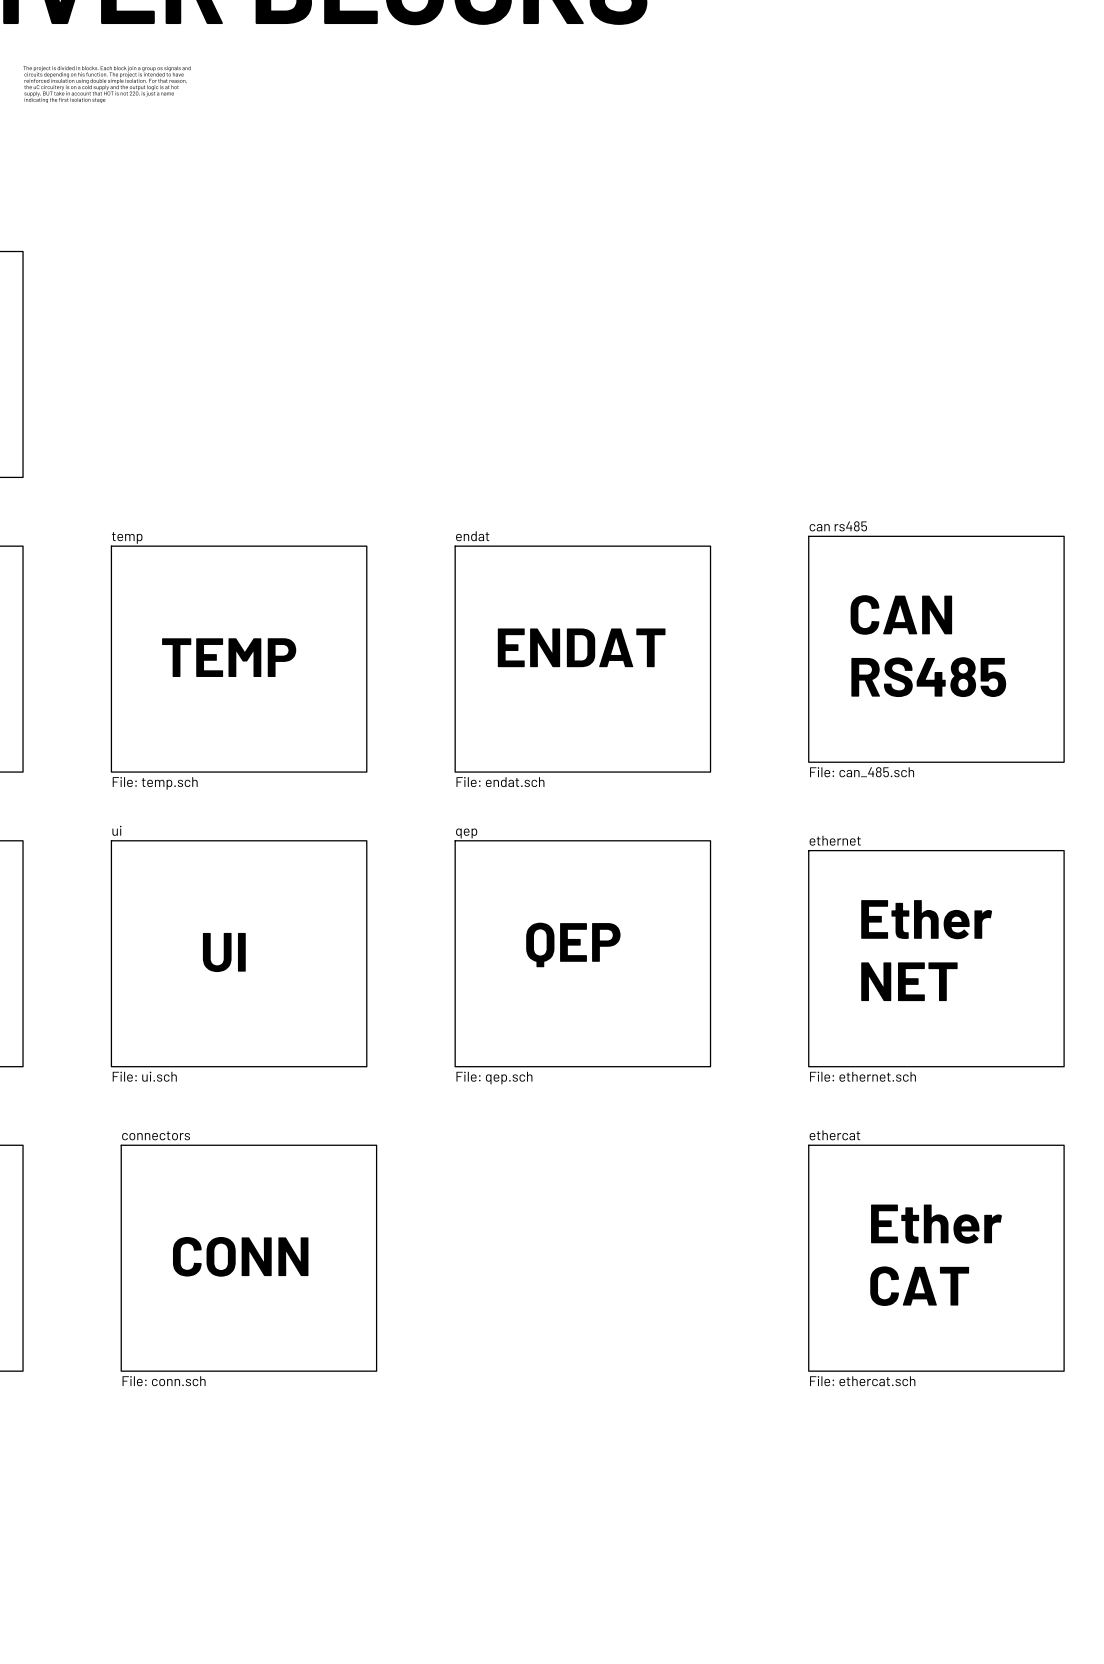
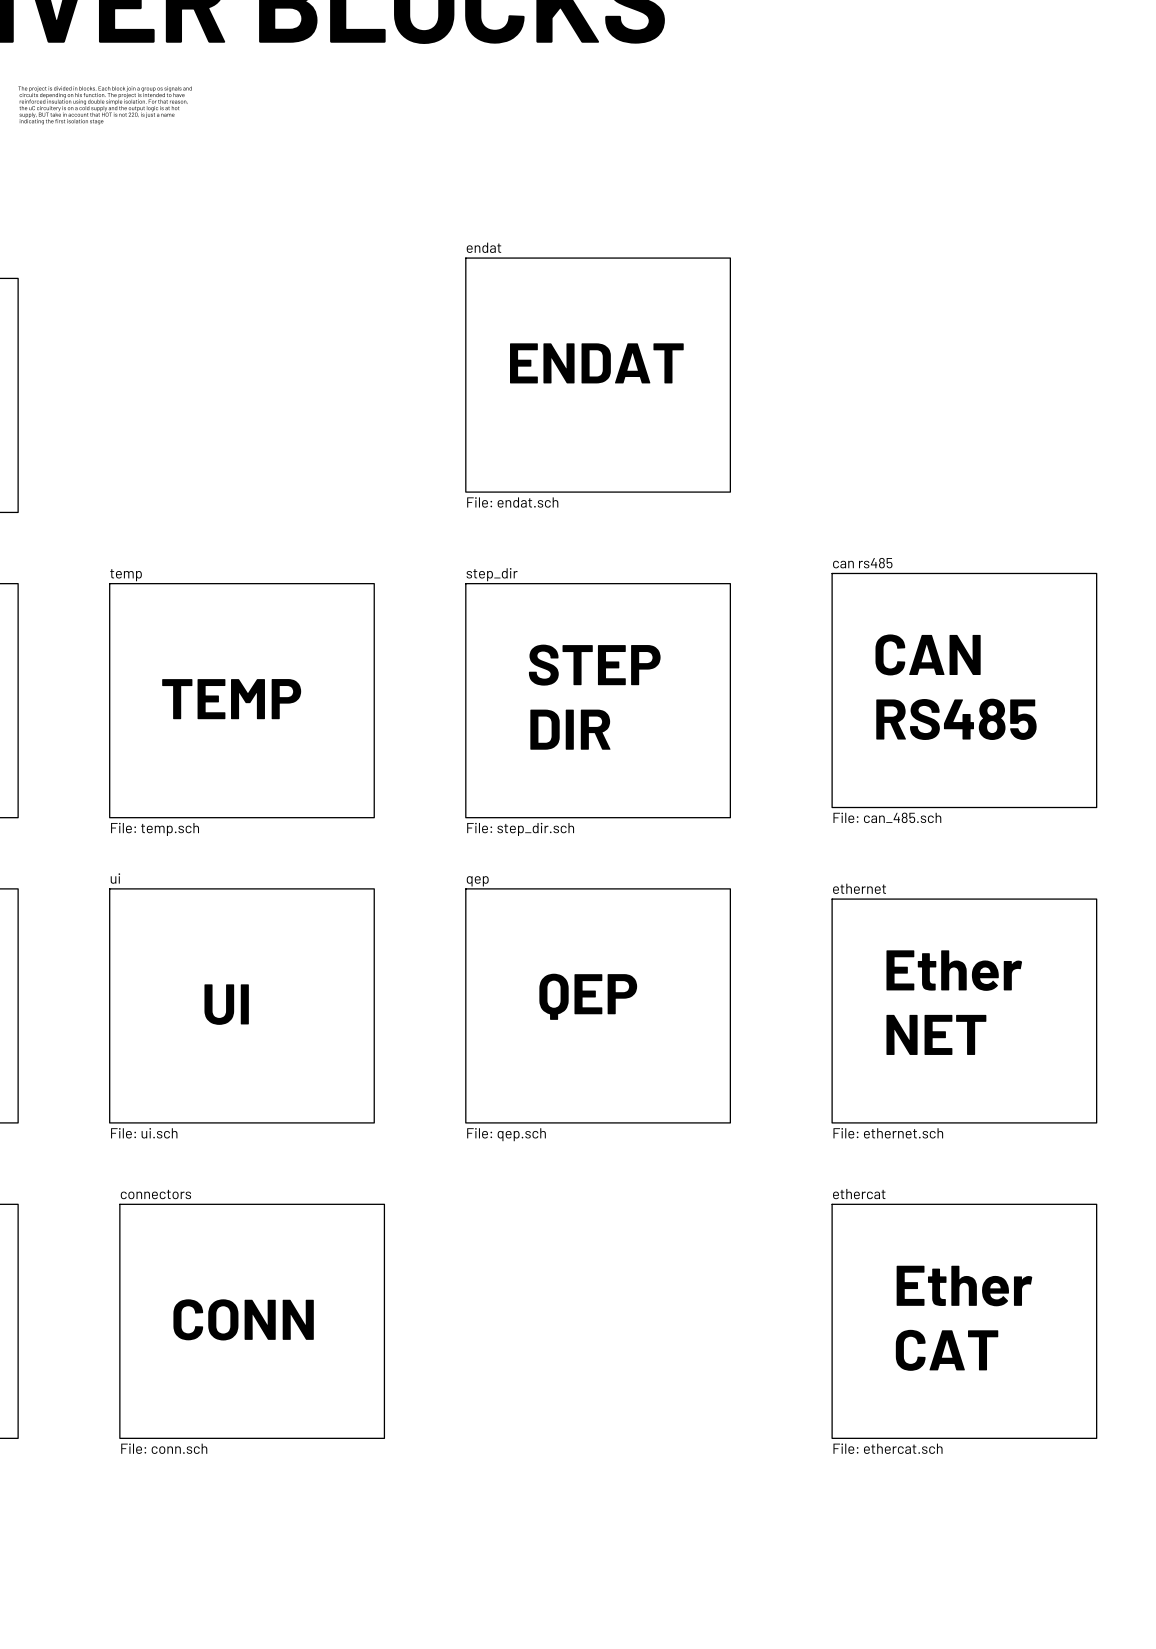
text: none -> ENDAT (596, 363)
sheet endat: none -> File: endat.sch (598, 375)
sheet endat name: endat (472, 536) -> step_dir (492, 574)
text: none -> STEP (594, 665)
text: ENDAT (581, 647) -> none
text: none -> DIR (570, 729)
sheet endat value: File: endat.sch (500, 782) -> File: step_dir.sch (520, 829)

